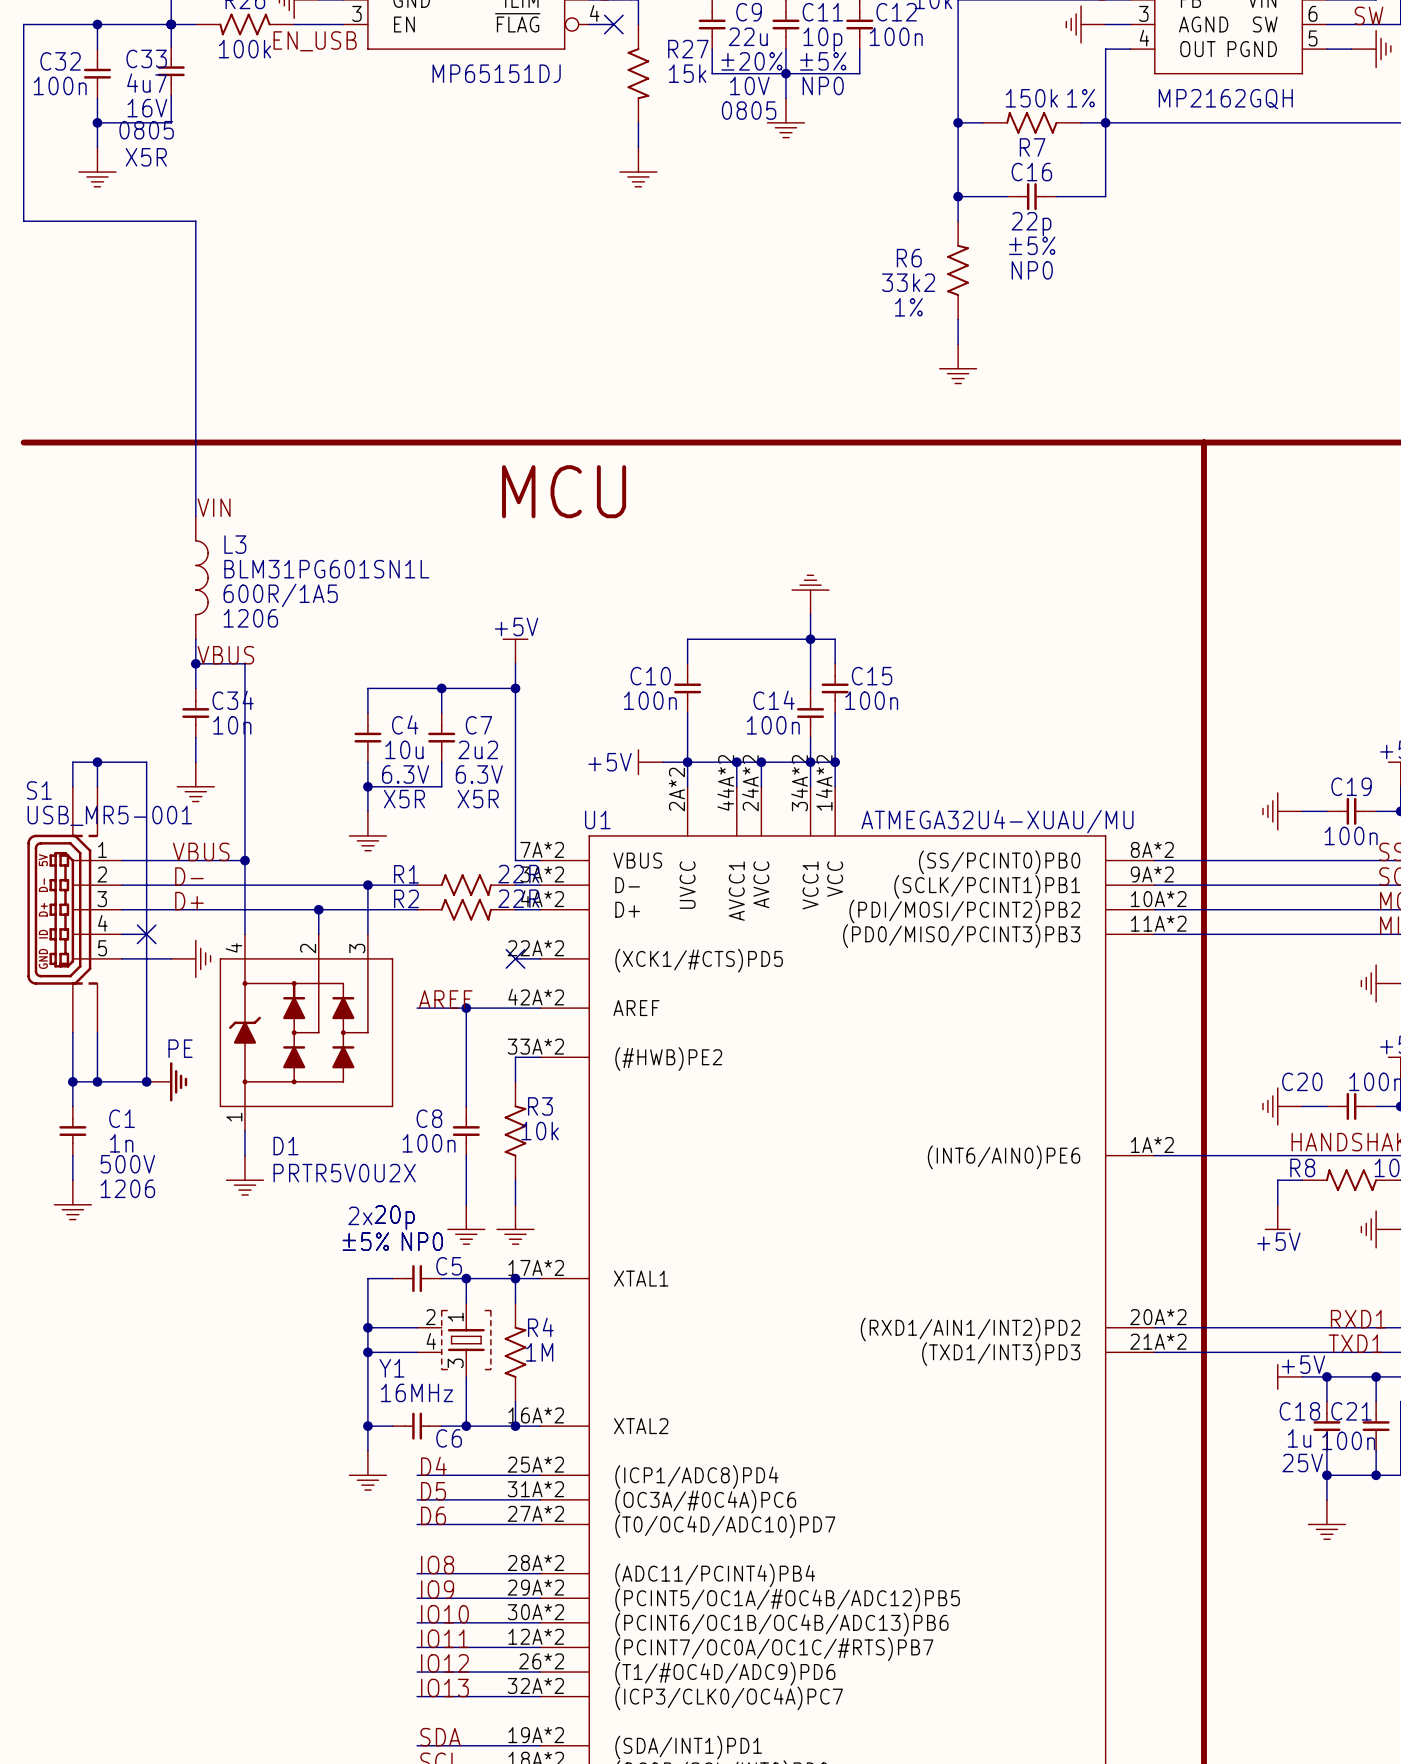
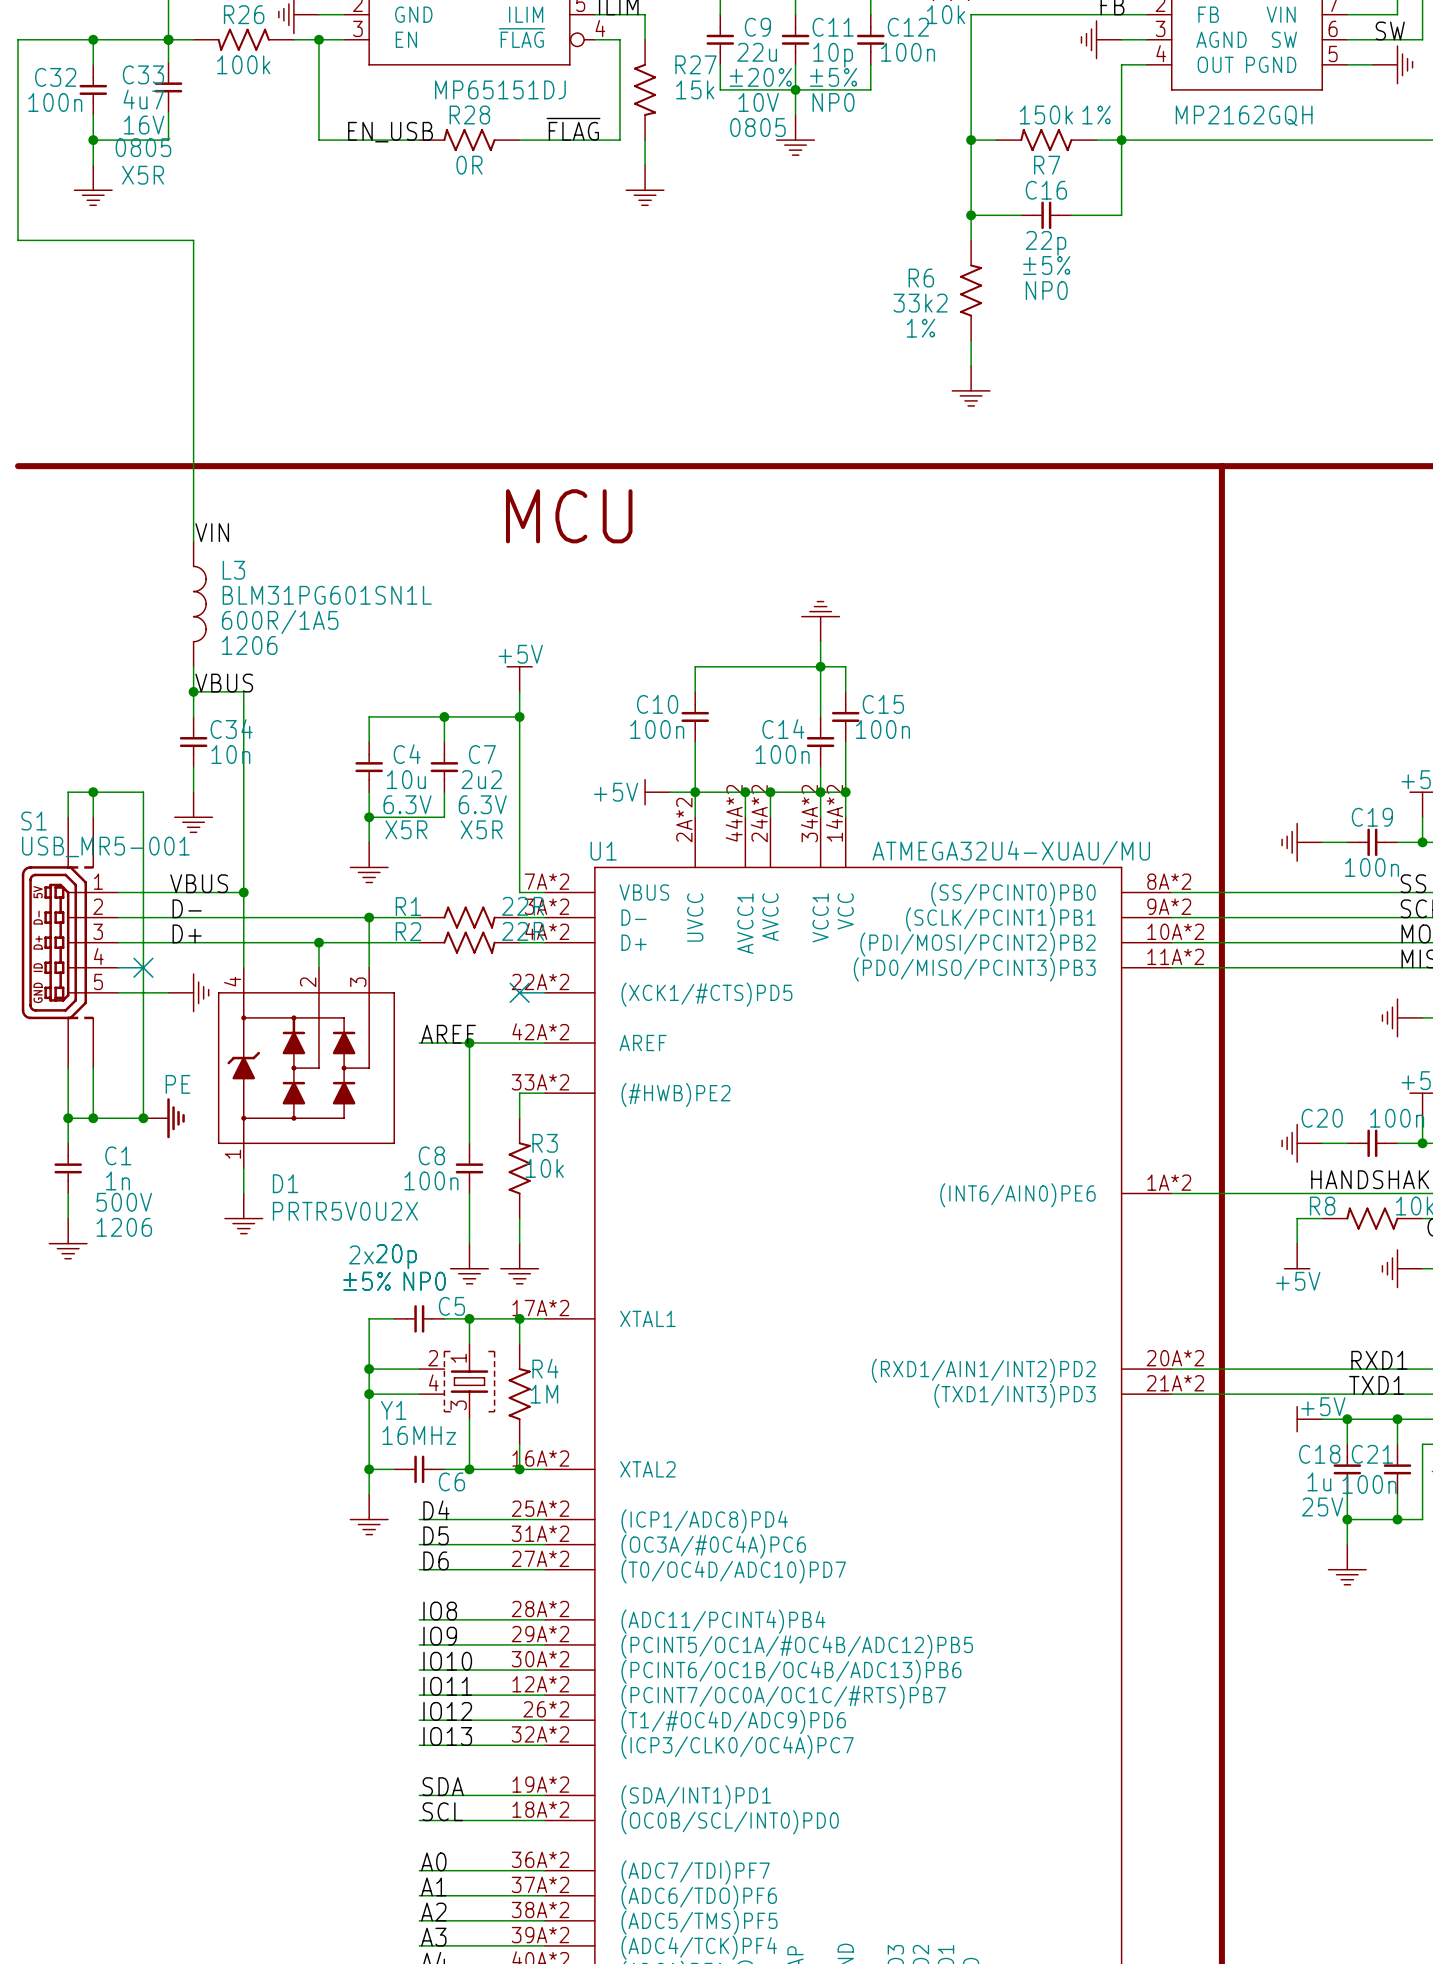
wire: none -> (319, 39) (319, 140) (419, 140)
junction: none -> (319, 39)
wire: none -> (594, 39) (619, 39) (619, 140) (519, 140)
part: (606, 24) -> none
label position: EN_USB (315, 41) -> EN_USB (390, 132)
label: none -> ~{FLAG} (573, 129)
R28: none -> 0R (469, 140)

